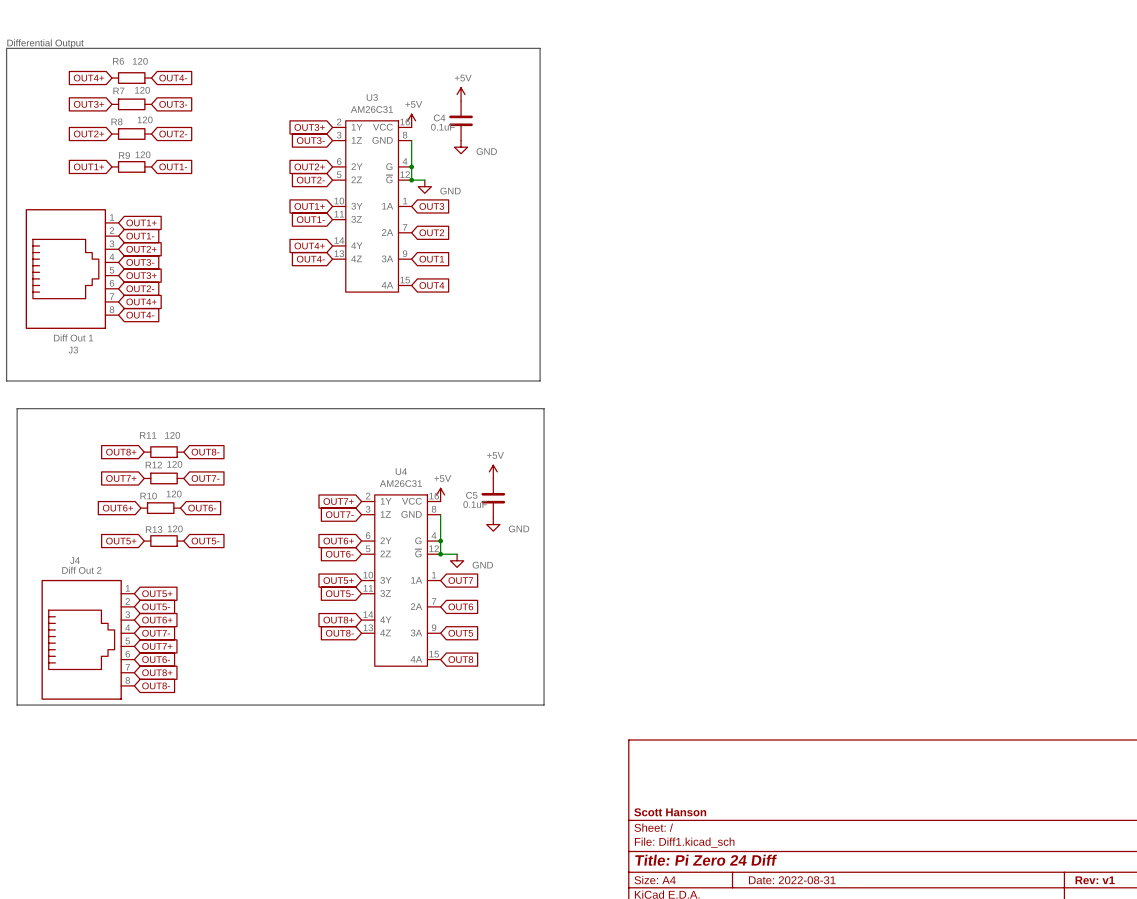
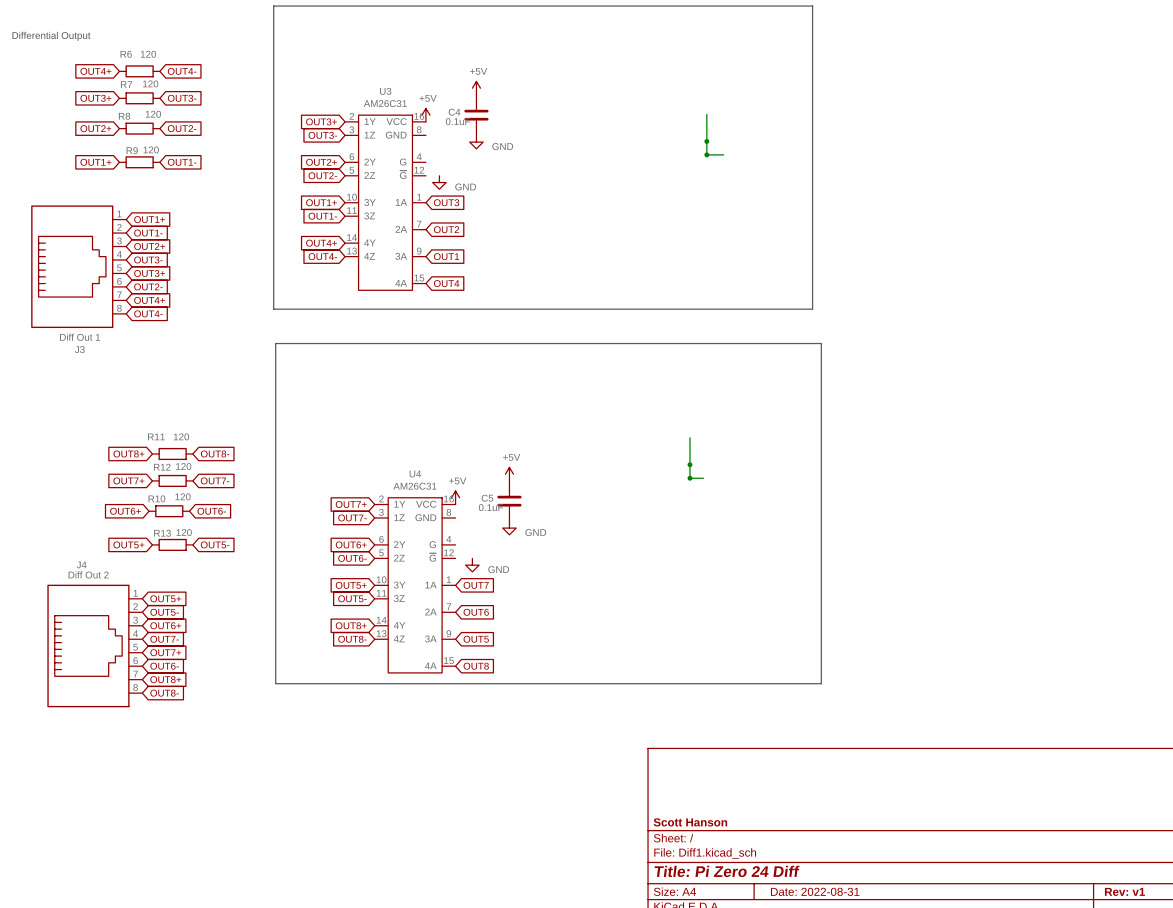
line: none -> (273, 6) (812, 6) (812, 309) (273, 309) (273, 6)
line: (6, 48) (6, 380) (540, 380) (540, 48) (6, 48) -> none
wire: none -> (706, 114) (706, 154) (723, 154)
wire: (411, 140) (411, 180) (424, 180) -> none
junction: none -> (706, 141)
junction: none -> (706, 154)
junction: (411, 166) -> none
junction: (411, 180) -> none
line: none -> (275, 343) (275, 683) (821, 683) (821, 343) (275, 343)
line: (17, 408) (544, 408) (544, 705) (17, 705) (17, 408) -> none
wire: none -> (689, 437) (689, 478) (703, 478)
junction: none -> (689, 464)
junction: none -> (689, 478)
wire: (440, 514) (440, 554) (457, 554) -> none
junction: (440, 541) -> none
junction: (440, 554) -> none

